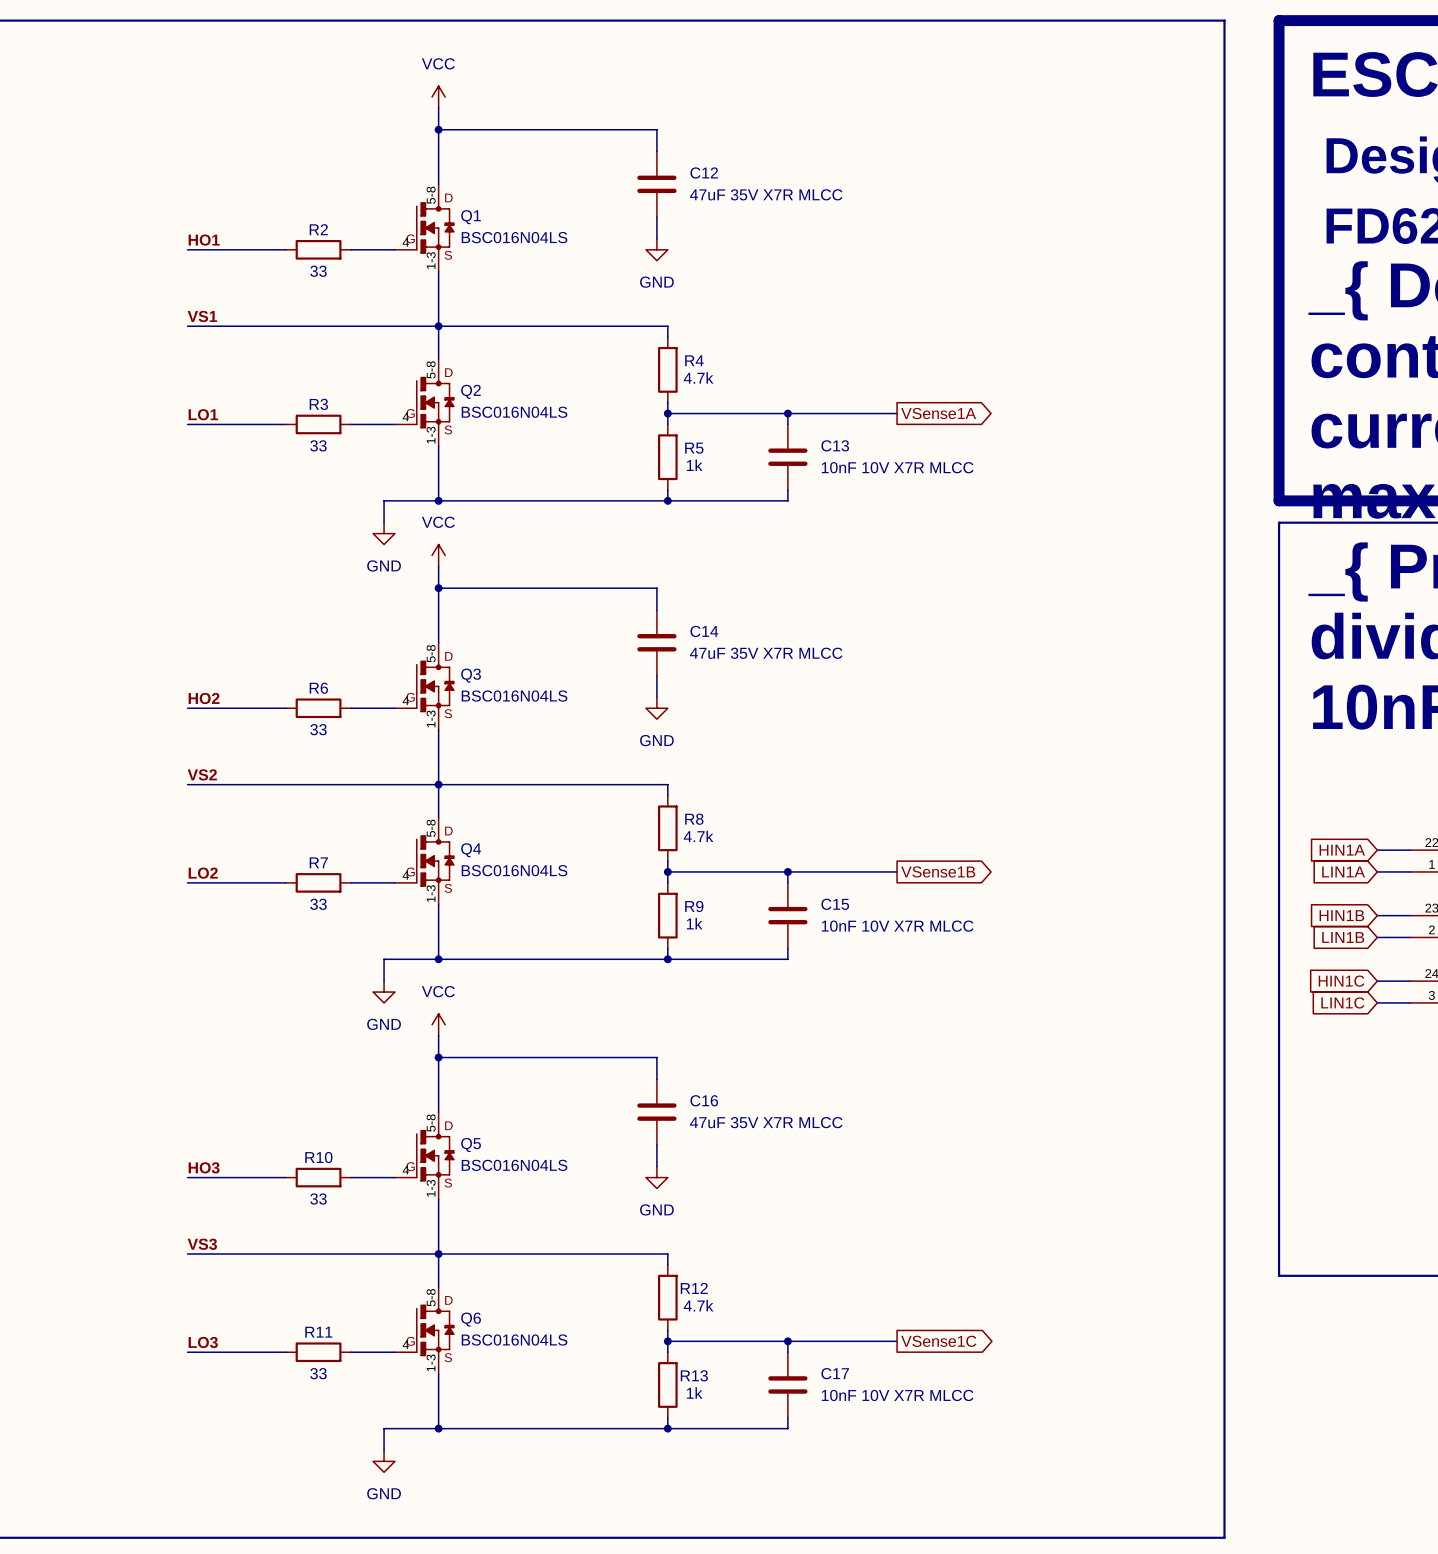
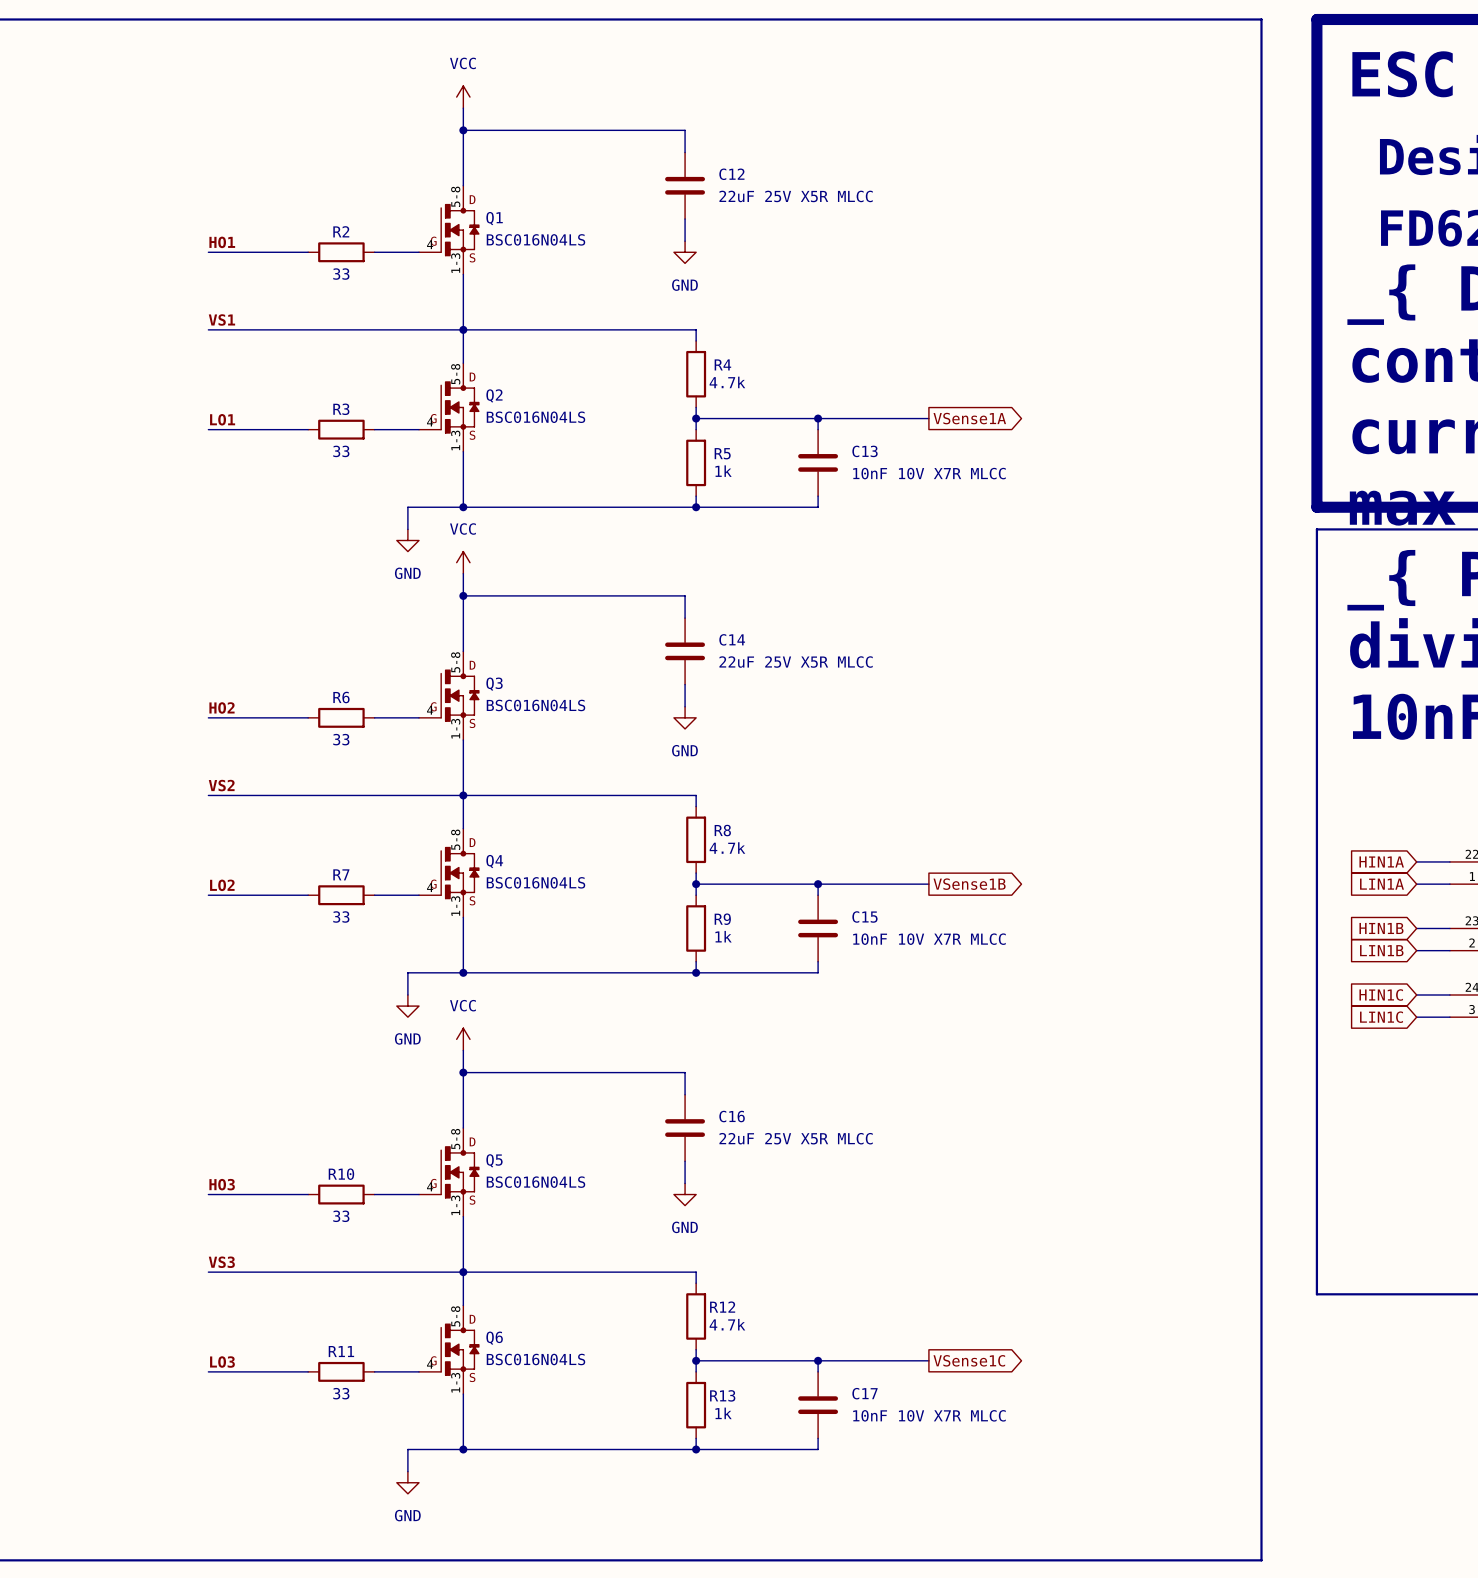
C12 value: 47uF 35V X7R MLCC (766, 194) -> 22uF 25V X5R MLCC (796, 196)
C14 value: 47uF 35V X7R MLCC (766, 653) -> 22uF 25V X5R MLCC (796, 662)
C16 value: 47uF 35V X7R MLCC (766, 1122) -> 22uF 25V X5R MLCC (796, 1138)

